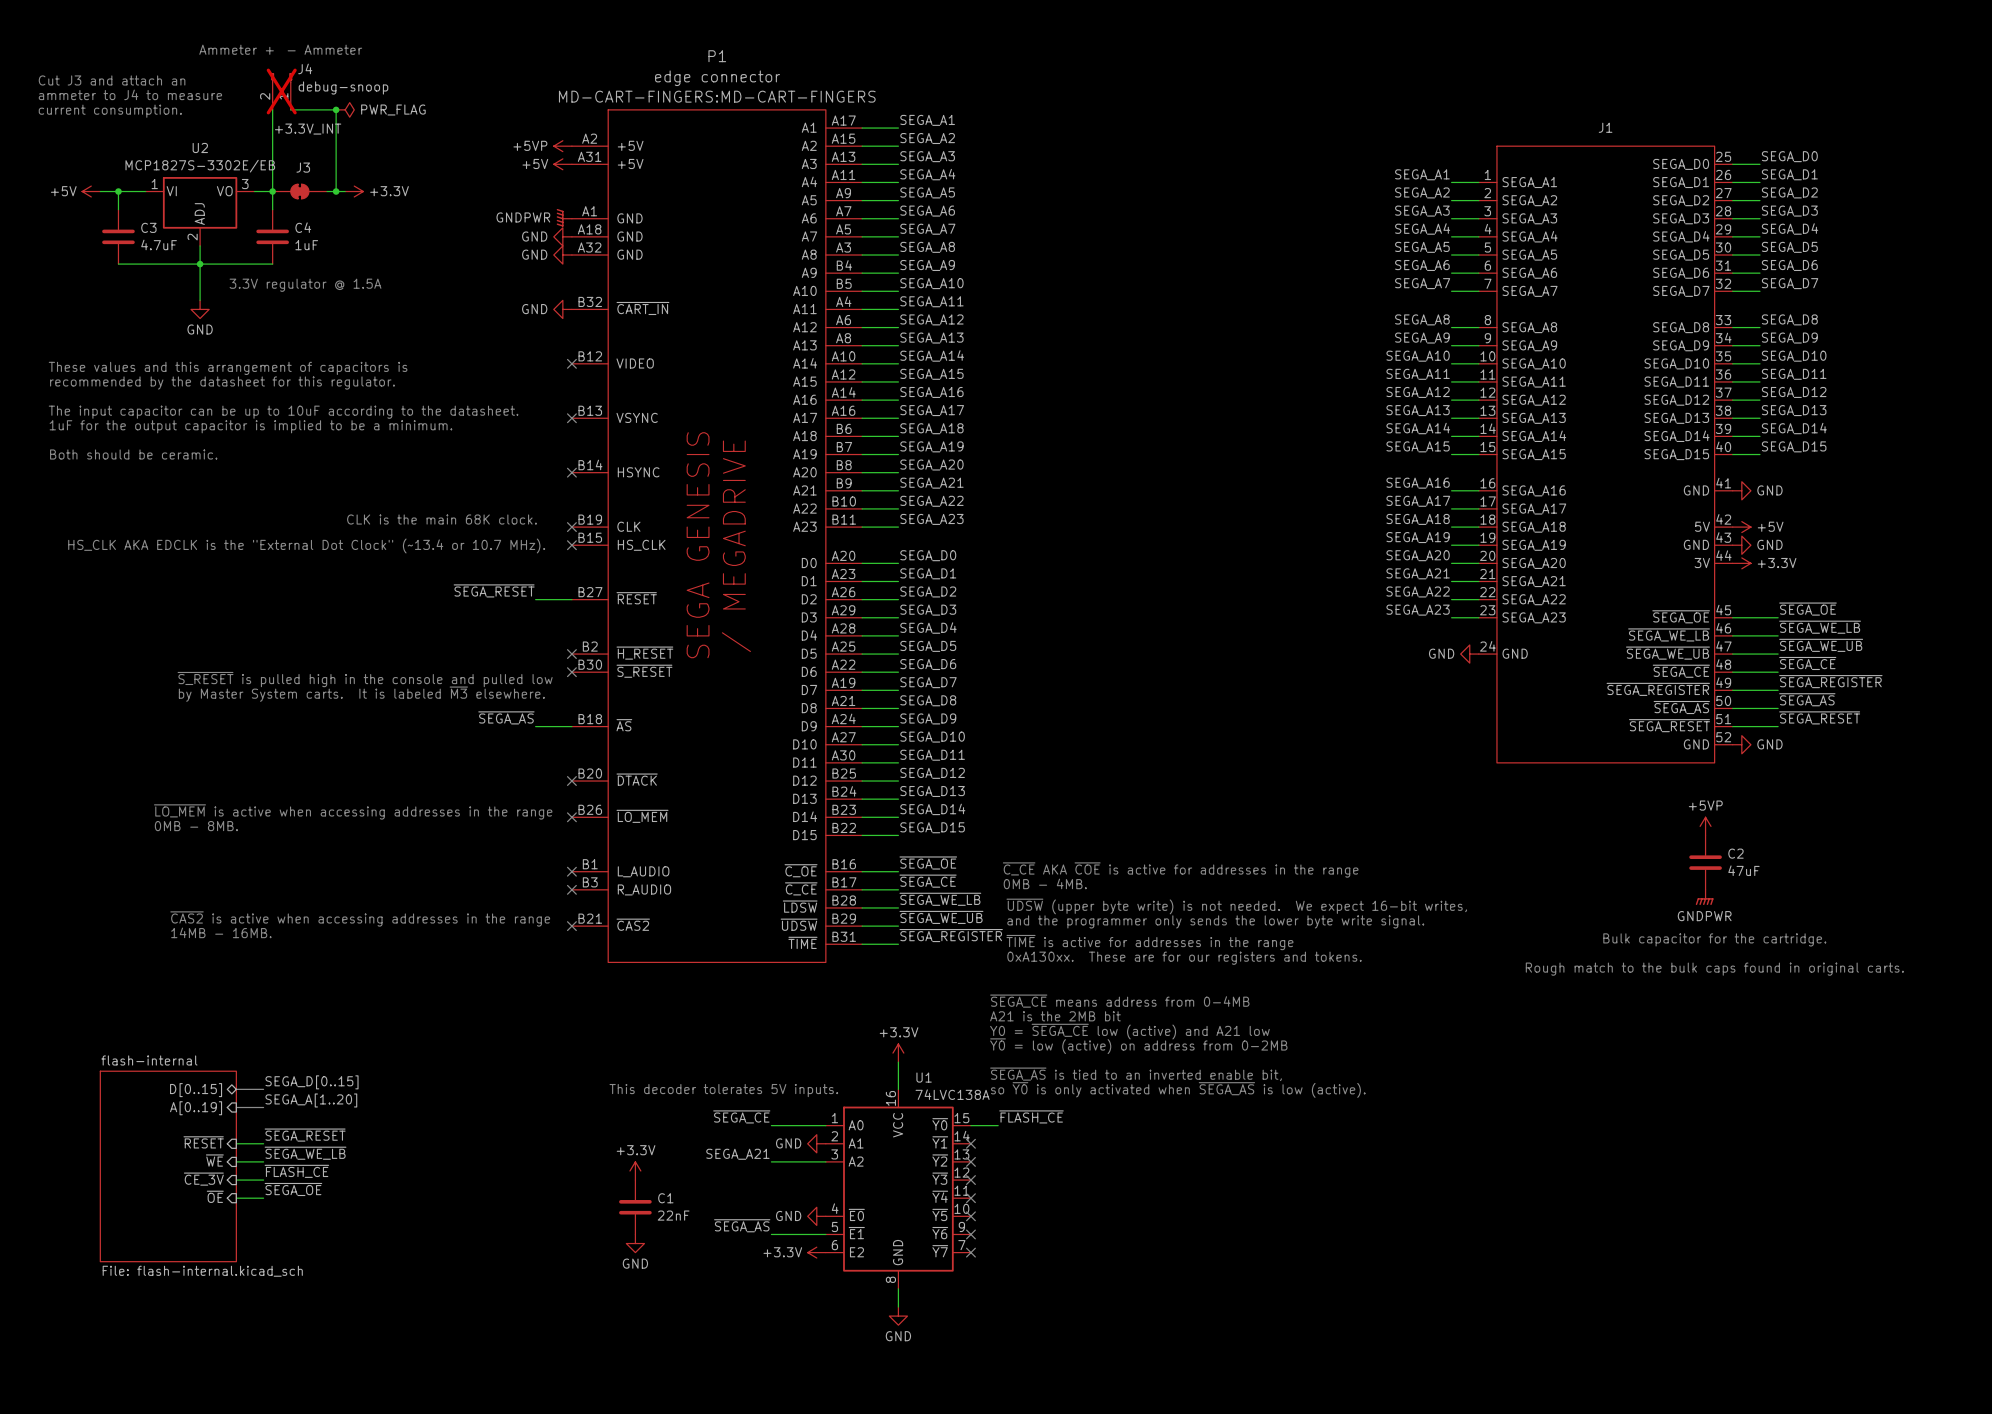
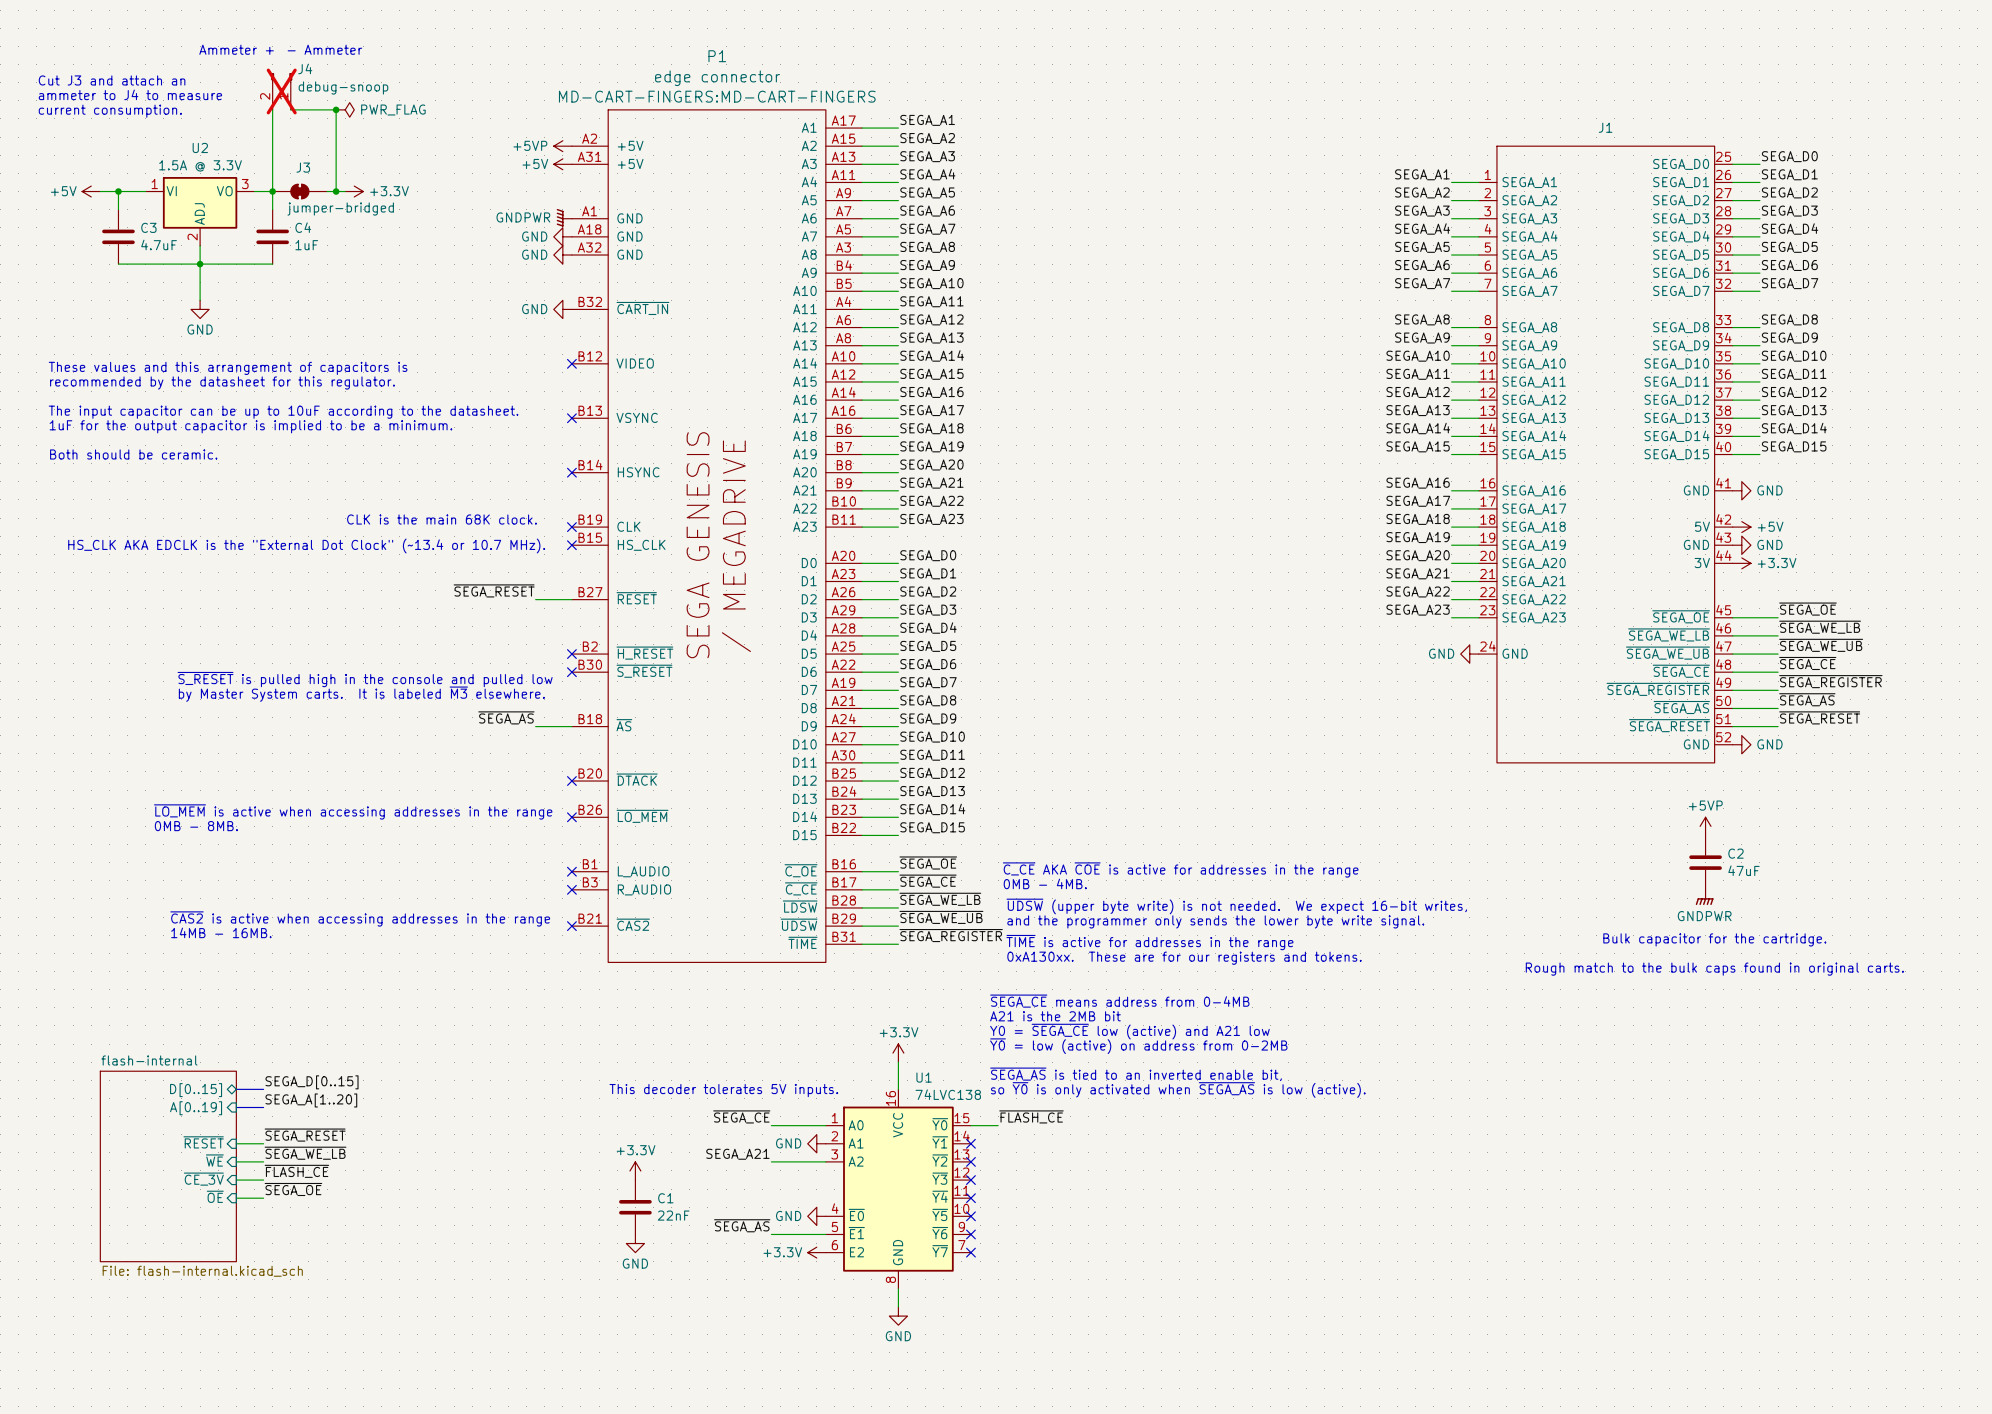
label: +3.3V_INT (308, 129) -> none
U2 value: MCP1827S-3302E/EB (200, 166) -> 1.5A @ 3.3V (200, 165)
J3 value: none -> jumper-bridged (340, 209)
text: 3.3V regulator @ 1.5A (305, 285) -> none
U1 value: 74LVC138A (952, 1094) -> 74LVC138 (948, 1094)

